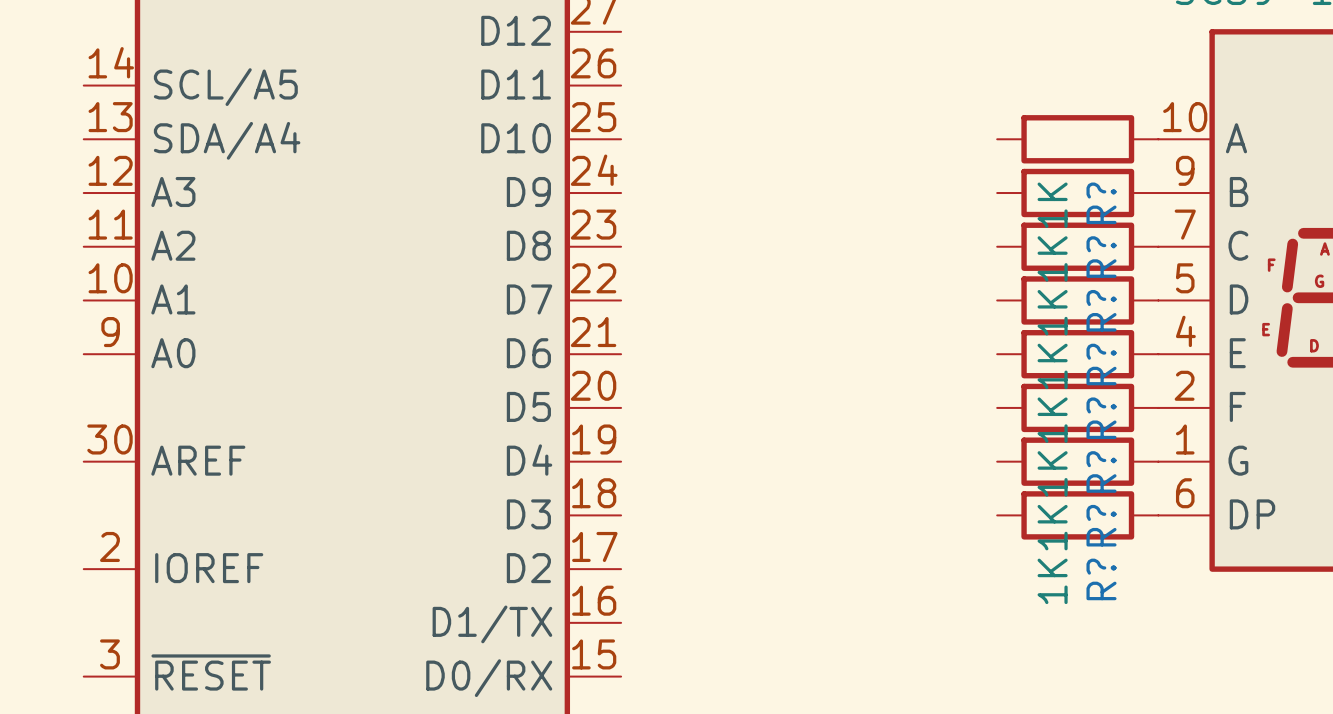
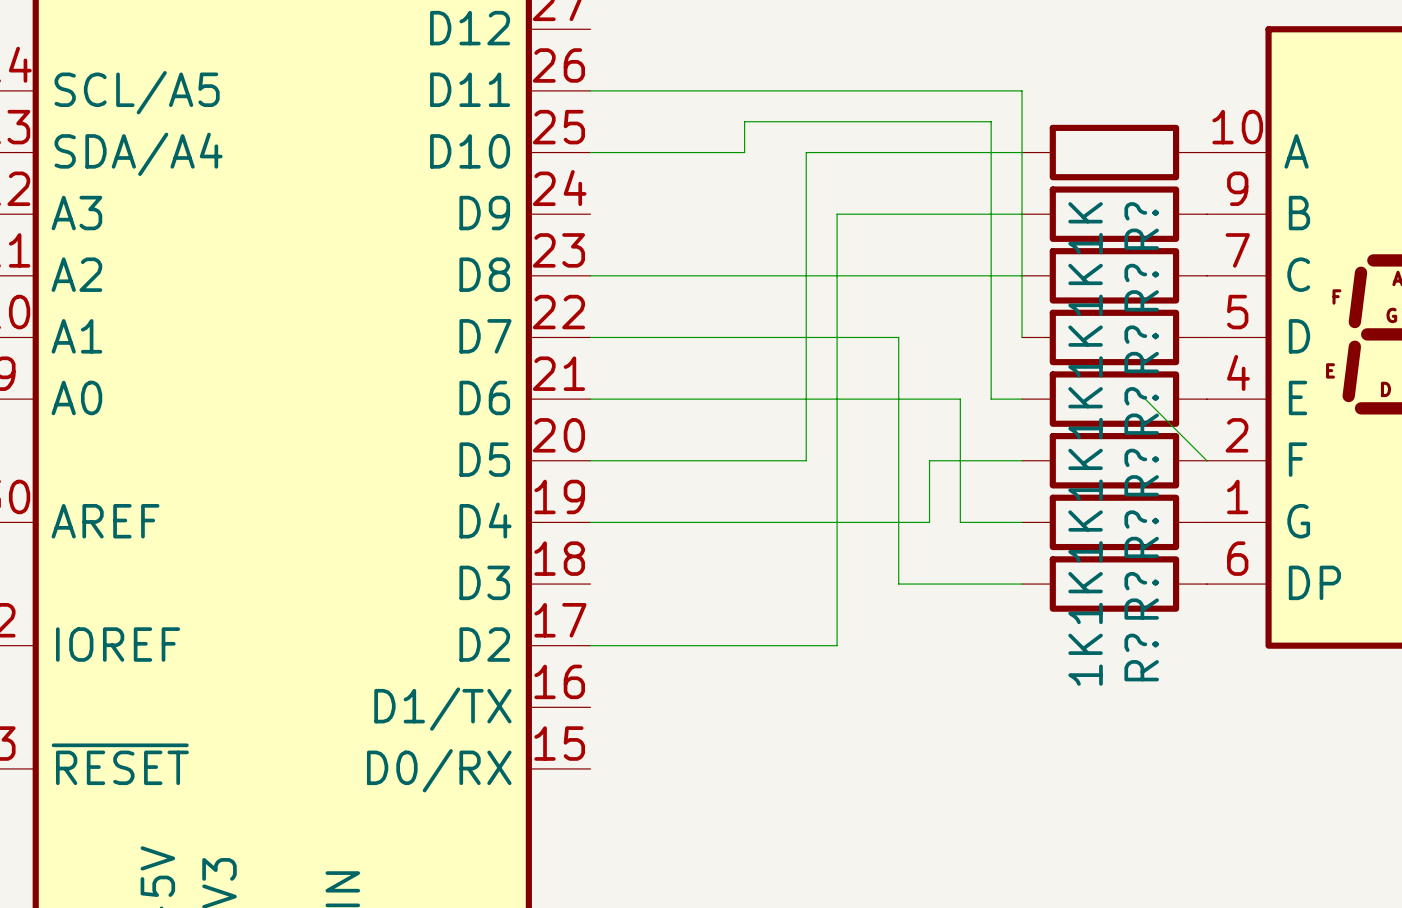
wire: none -> (590, 90) (1021, 90) (1021, 337)
wire: none -> (590, 152) (744, 152) (744, 121) (991, 121) (991, 399) (1021, 399)
wire: none -> (1021, 152) (806, 152) (806, 460) (590, 460)
wire: none -> (1021, 214) (837, 214) (837, 645) (590, 645)
wire: none -> (590, 275) (1021, 275)
wire: none -> (590, 337) (898, 337) (898, 584) (1021, 584)
wire: none -> (590, 399) (960, 399) (960, 522) (1021, 522)
wire: none -> (1145, 399) (1206, 460)
wire: none -> (1021, 460) (929, 460) (929, 522) (590, 522)

